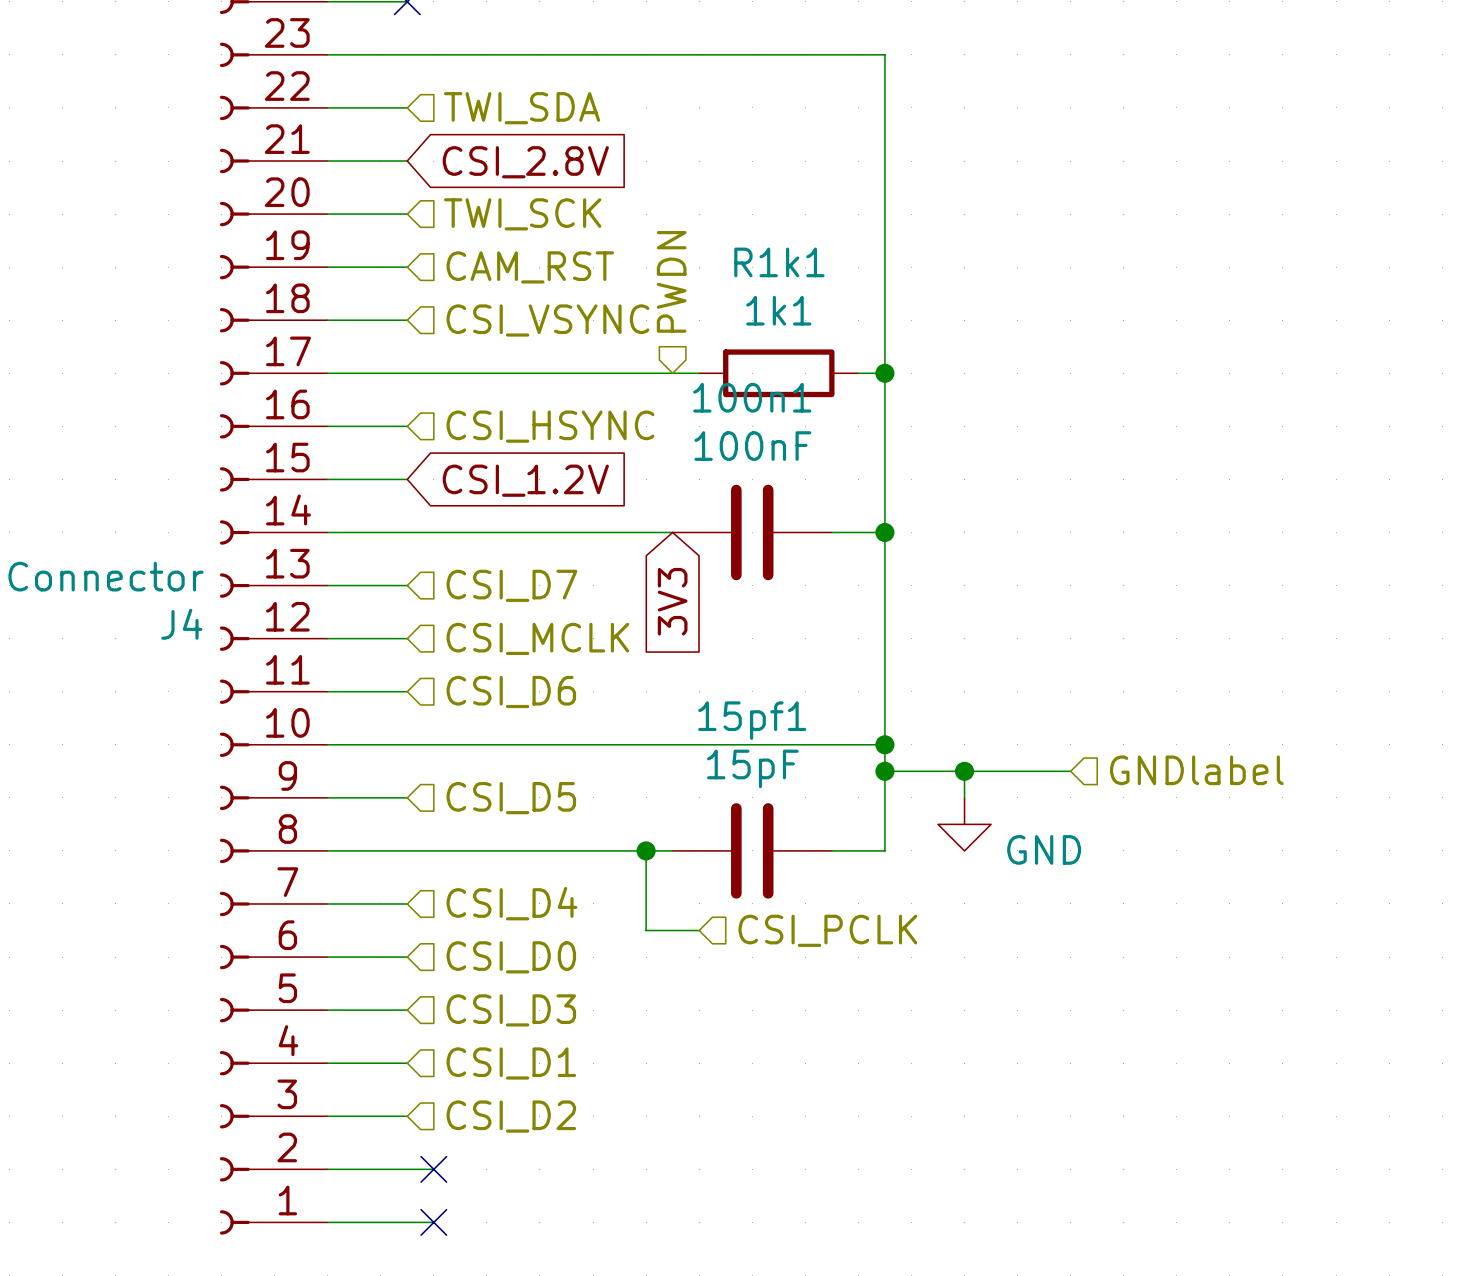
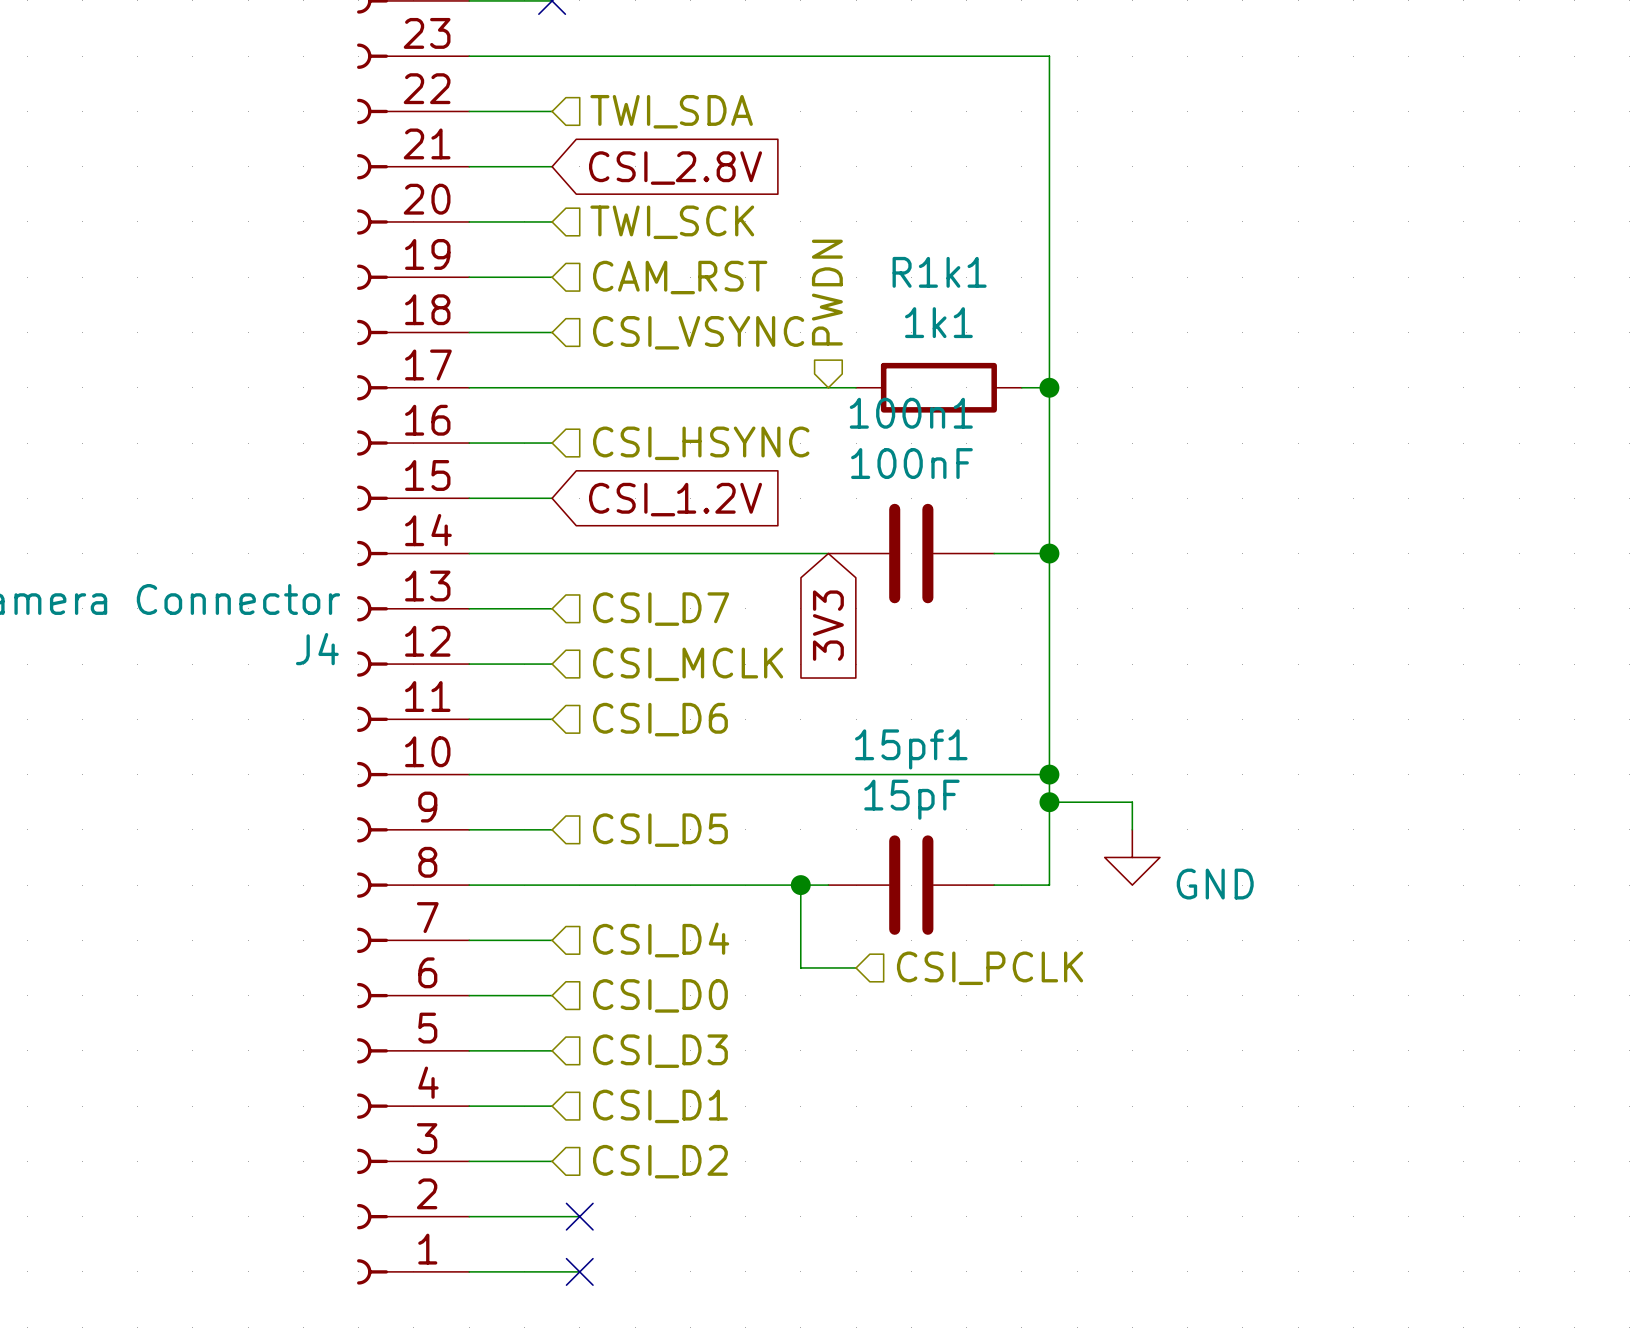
hierarchical label: GNDlabel (1196, 770) -> none
wire: (964, 771) (1070, 771) -> none
junction: (964, 771) -> none

